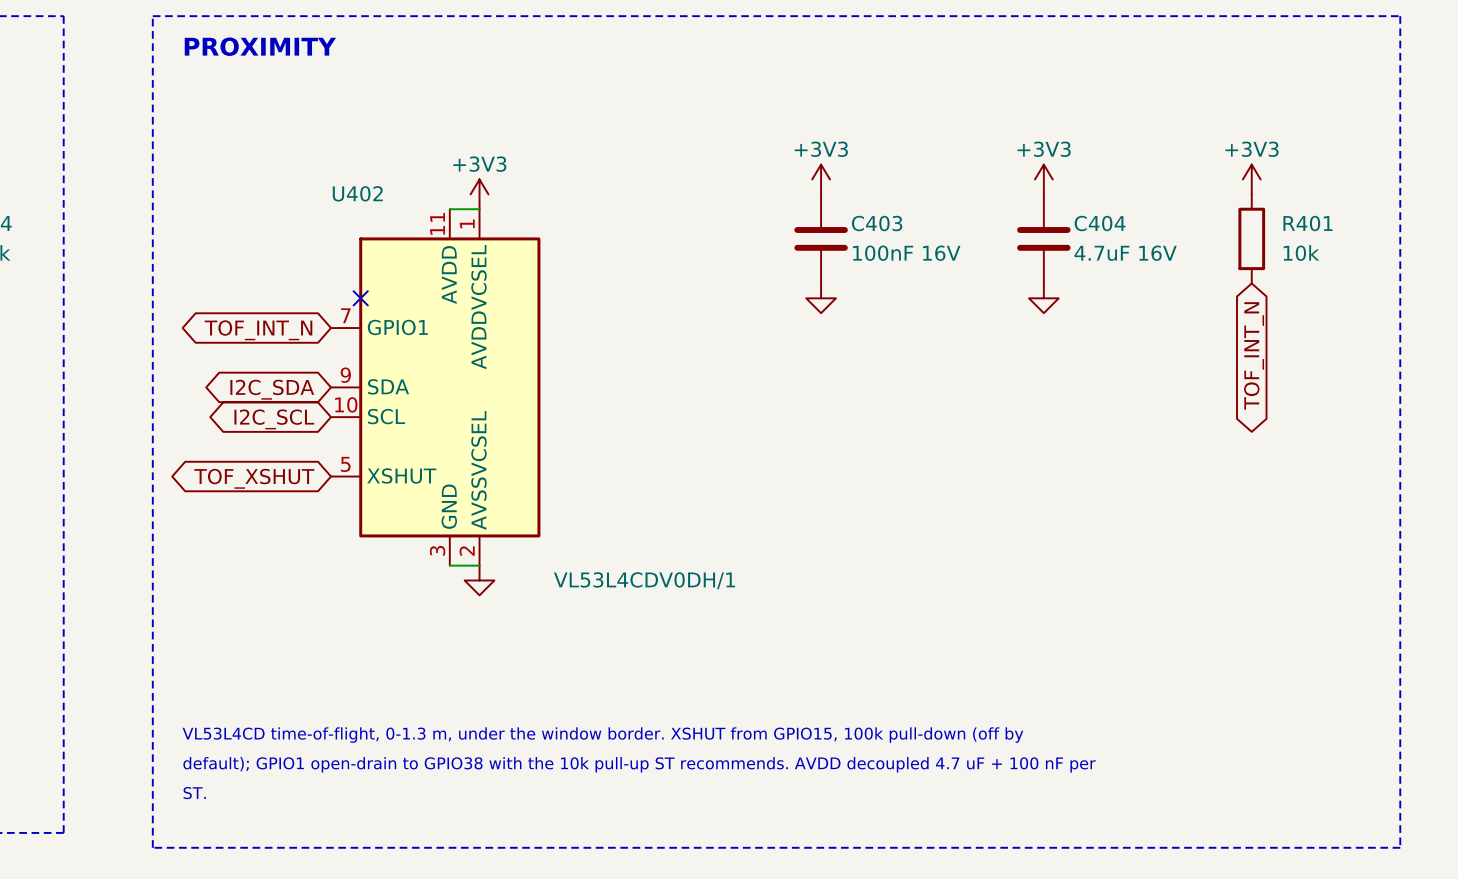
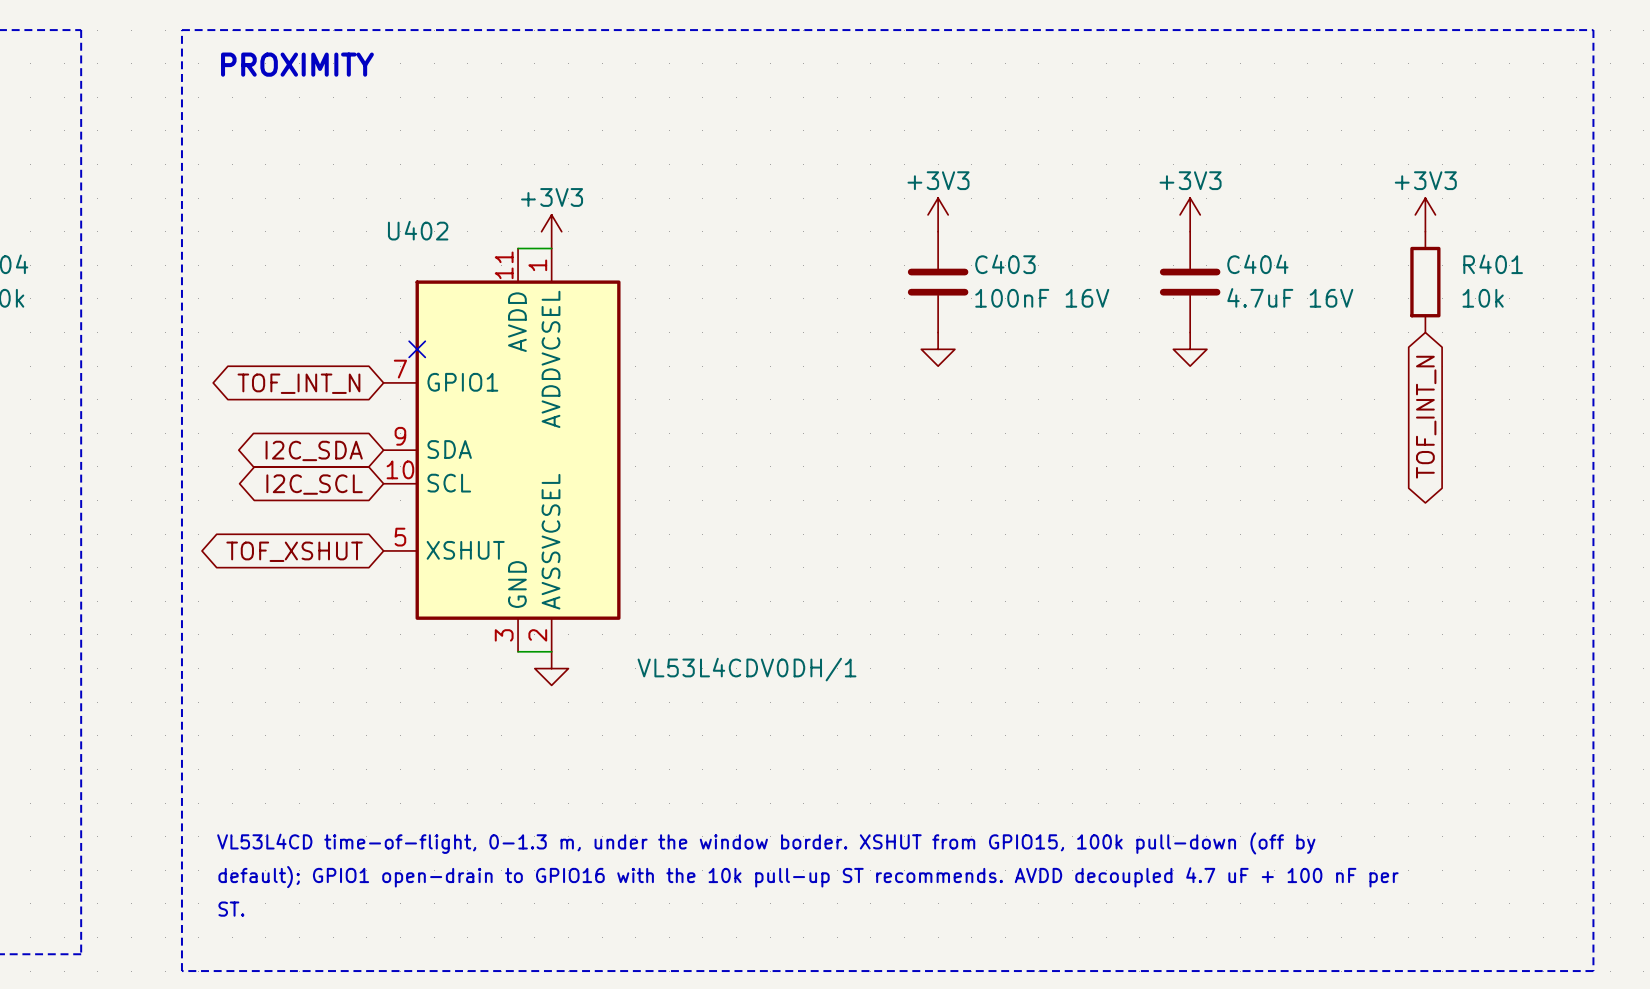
text: default); GPIO1 open-drain to GPIO38 with the 10k pull-up ST recommends. AVDD decoupled 4.7 uF + 100 nF per (639, 764) -> default); GPIO1 open-drain to GPIO16 with the 10k pull-up ST recommends. AVDD decoupled 4.7 uF + 100 nF per (808, 877)

